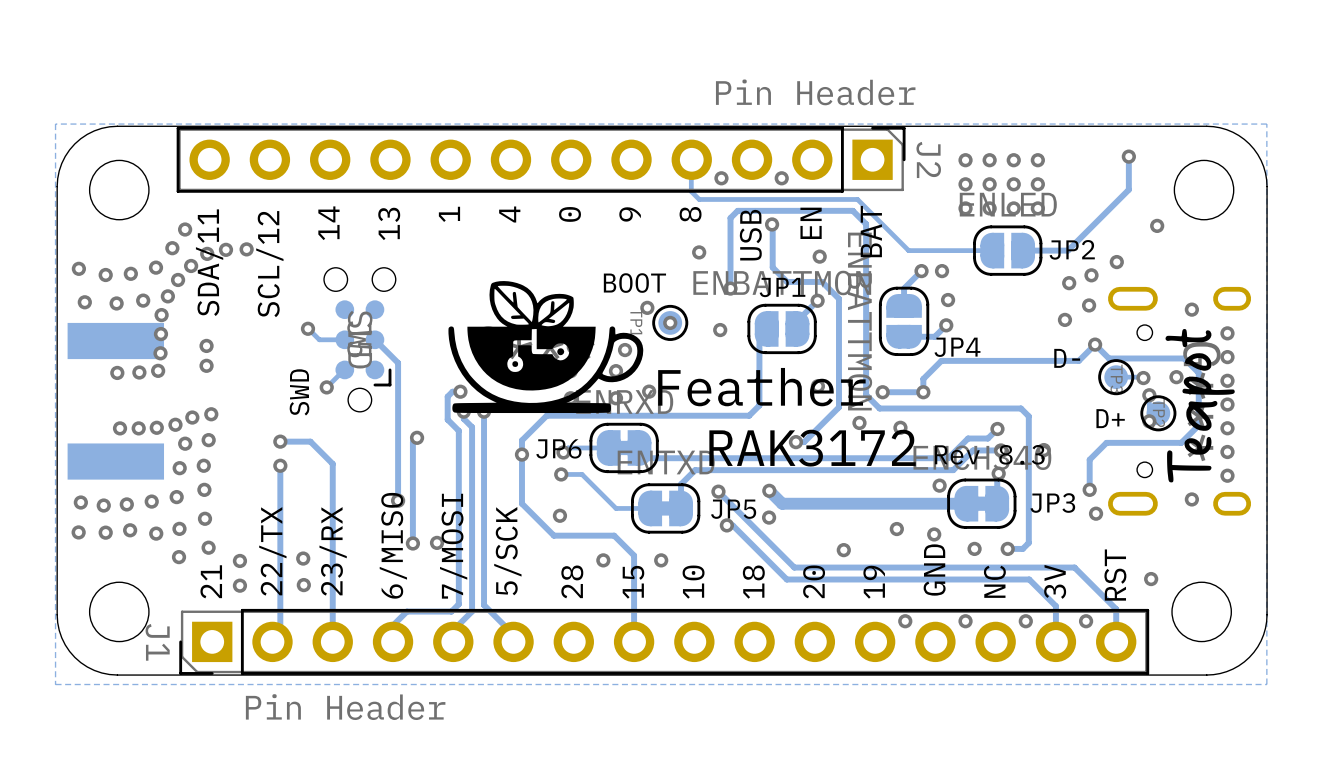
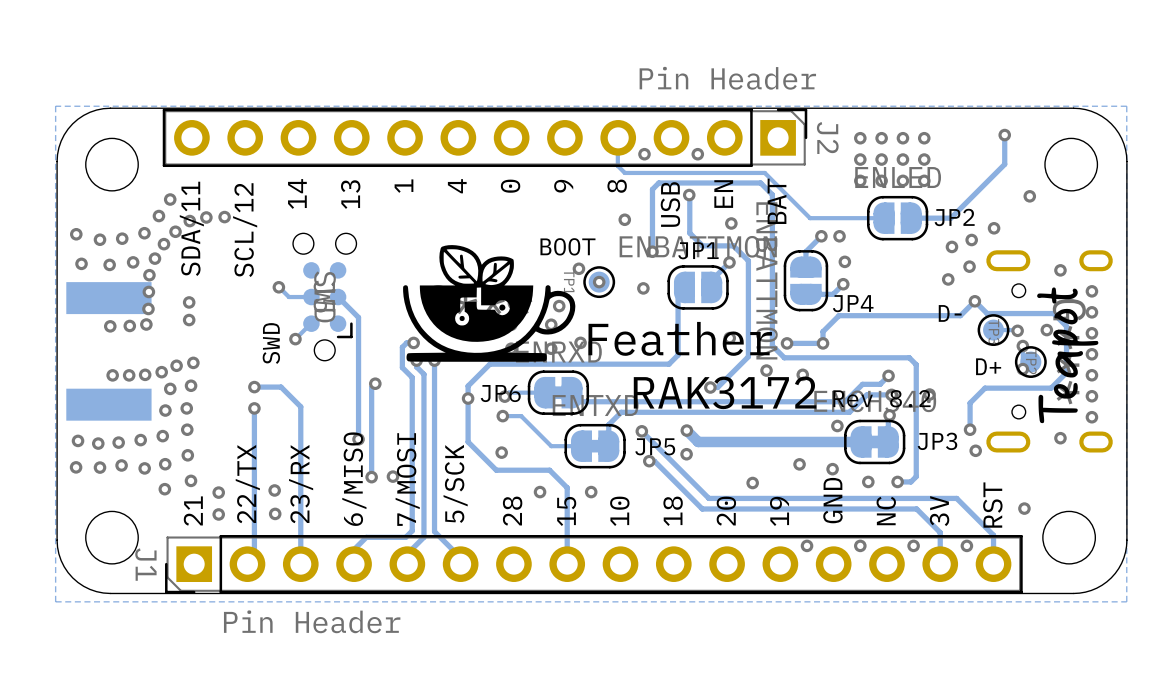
text: Rev 8.3 (989, 454) -> Rev 8.2 (881, 398)

